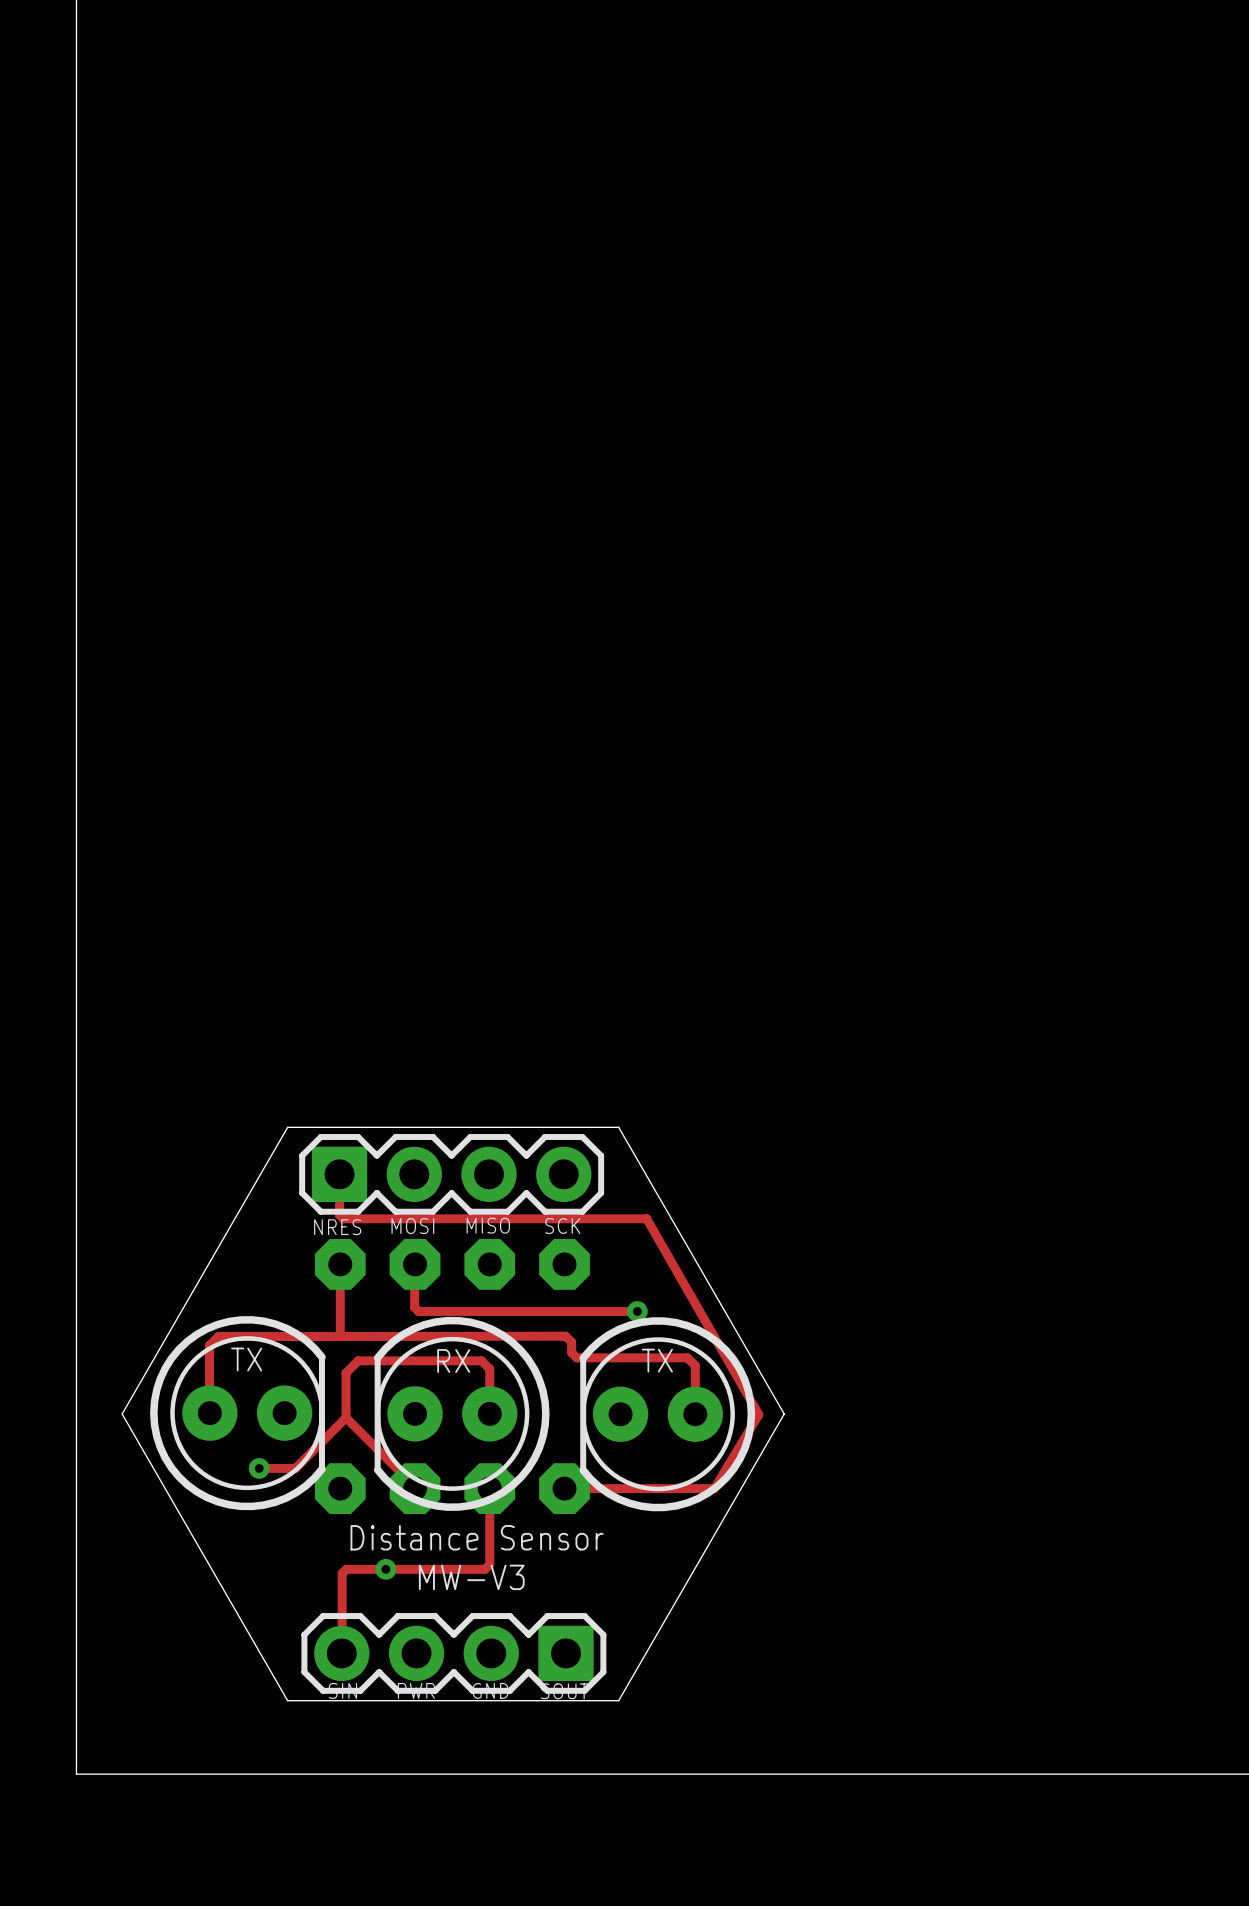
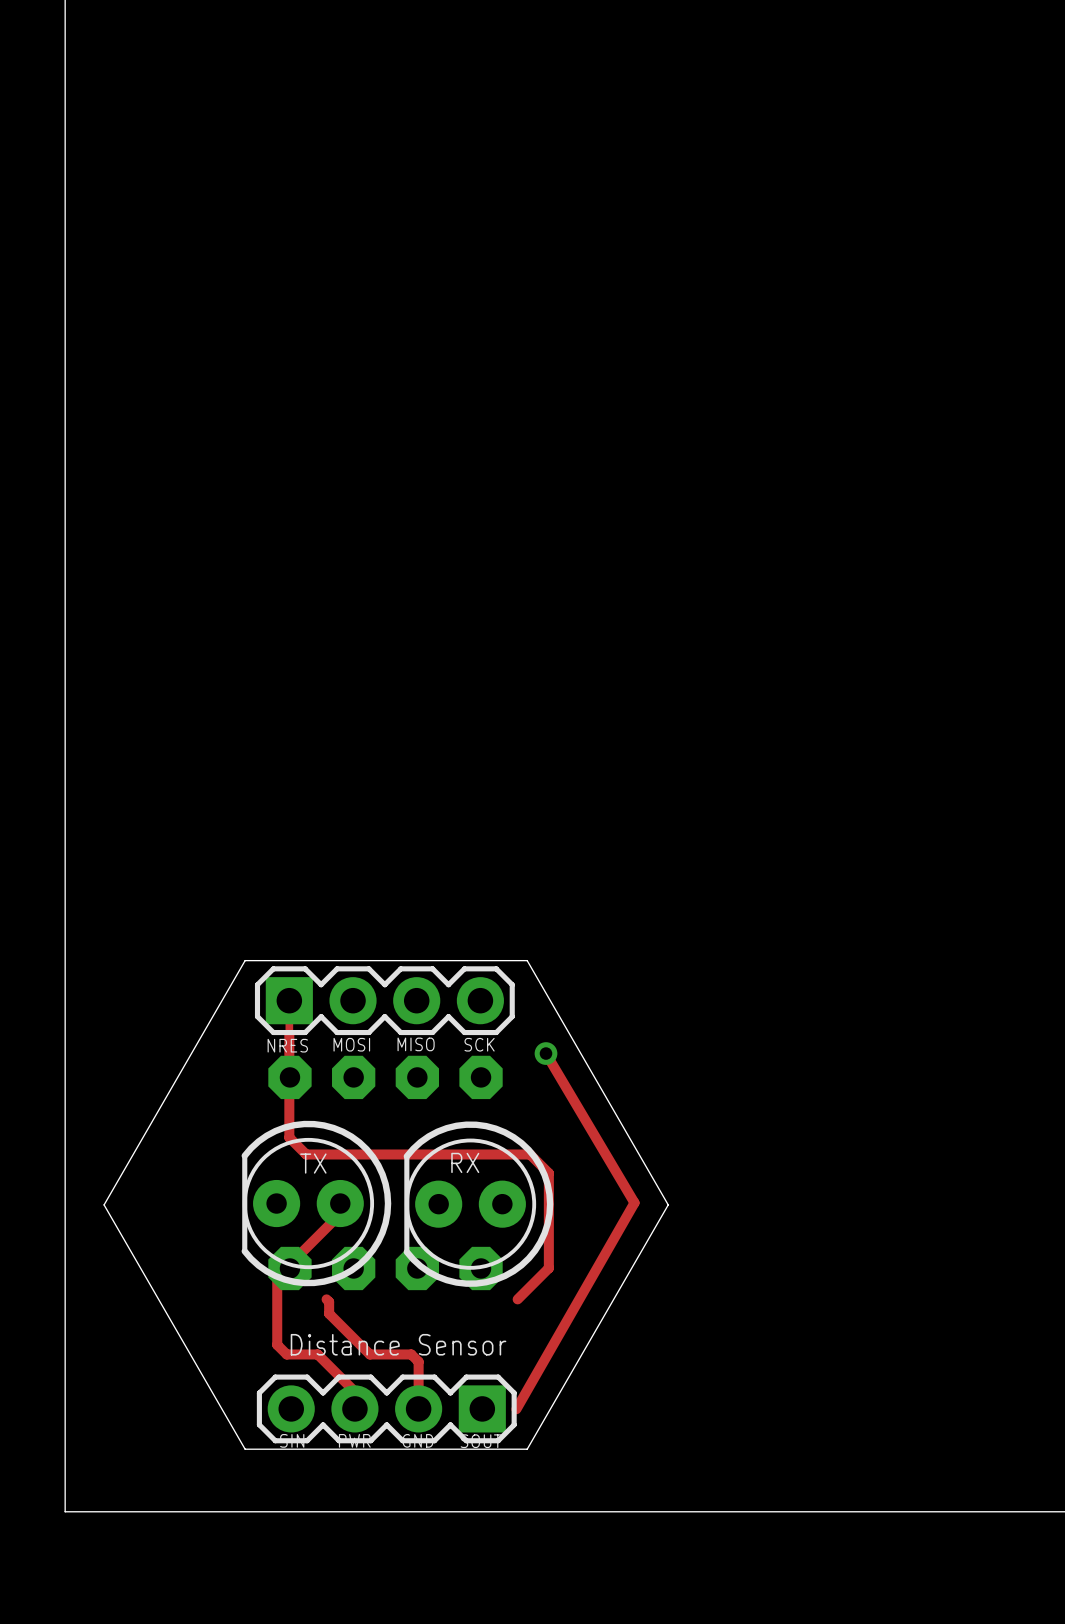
track: (339, 1215) (343, 1218) (646, 1218) (758, 1414) (714, 1488) (564, 1488) -> (289, 1035) (289, 1137) (306, 1154) (530, 1154) (548, 1173) (548, 1268) (517, 1299)
track: none -> (546, 1053) (634, 1202) (516, 1409)
via: none -> (546, 1053)
track: (414, 1264) (414, 1307) (418, 1311) (637, 1311) -> none
via: (637, 1311) -> none
text position: TX (246, 1359) -> TX (313, 1163)
text: TX (657, 1360) -> none
text position: RX (453, 1361) -> RX (465, 1162)
track: (209, 1412) (209, 1345) (218, 1336) (565, 1336) (571, 1342) (571, 1352) (576, 1357) (687, 1357) (695, 1365) (695, 1414) -> none
part: none -> (316, 1203)
track: none -> (340, 1203) (345, 1208) (277, 1277) (277, 1344) (286, 1354) (317, 1354) (354, 1391) (354, 1408)
part: (237, 1413) -> none
part: (461, 1413) -> none
track: (489, 1413) (489, 1369) (481, 1360) (358, 1360) (346, 1372) (346, 1417) -> none
part: none -> (478, 1204)
part: (667, 1414) -> none
track: (346, 1417) (295, 1468) (259, 1468) -> none
track: (346, 1417) (415, 1488) -> none
via: (259, 1468) -> none
track: (489, 1488) (489, 1564) (484, 1569) (346, 1569) (342, 1573) (342, 1653) -> none
track: none -> (326, 1299) (329, 1301) (329, 1313) (369, 1354) (411, 1354) (418, 1361) (418, 1408)
text position: Distance Sensor (477, 1537) -> Distance Sensor (398, 1344)
via: (385, 1569) -> none
text: MW-V3 (471, 1577) -> none

